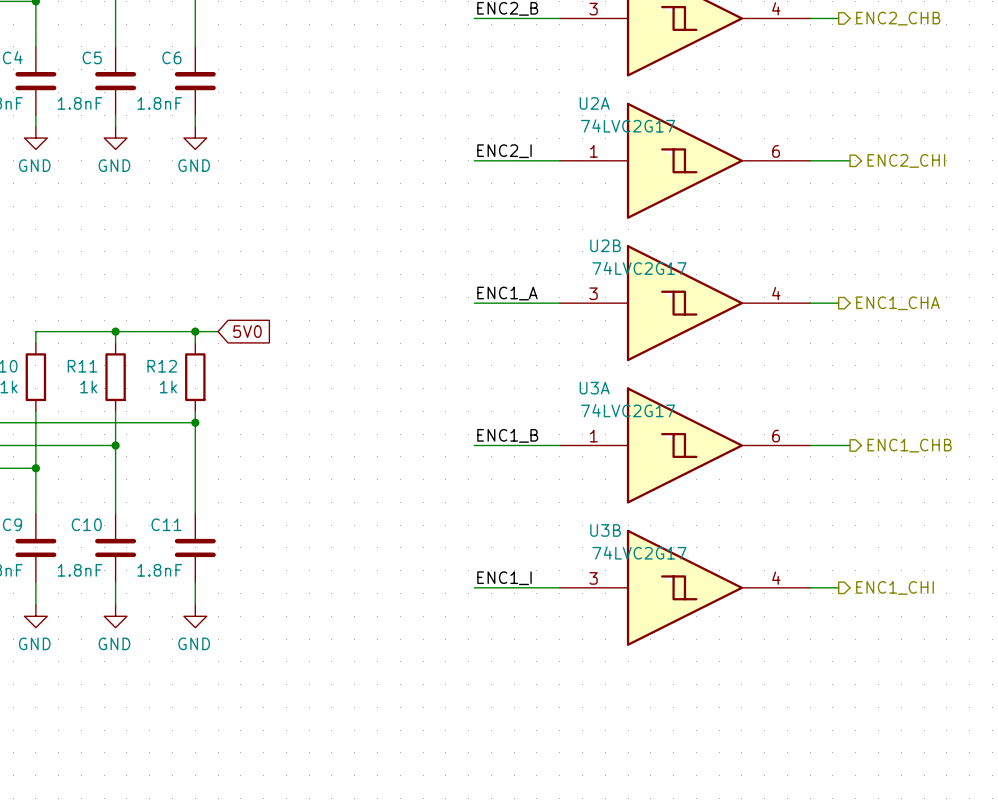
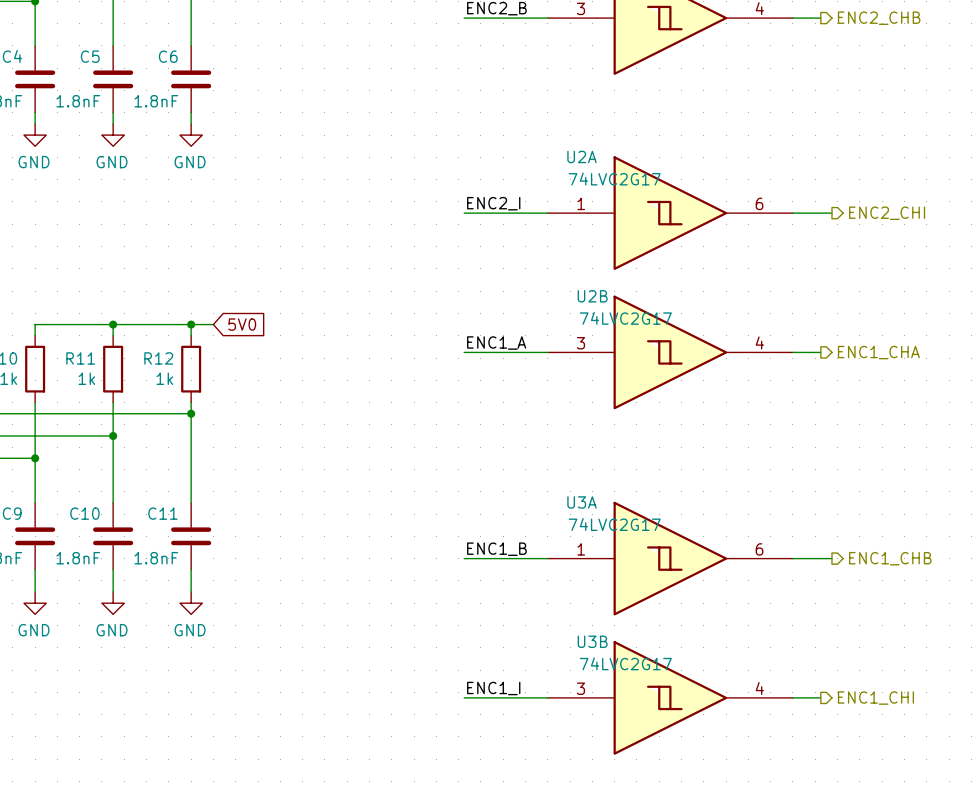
label position: ENC2_I (504, 151) -> ENC2_I (493, 203)
wire: (474, 160) (559, 160) -> (464, 213) (547, 213)
U2A position: (684, 160) -> (670, 213)
wire: (810, 160) (850, 160) -> (792, 213) (831, 213)
hierarchical label position: ENC2_CHI (906, 160) -> ENC2_CHI (887, 213)
label position: ENC1_A (507, 293) -> ENC1_A (496, 343)
wire: (474, 303) (559, 303) -> (464, 352) (547, 352)
U2B position: (684, 303) -> (670, 352)
wire: (810, 303) (838, 303) -> (792, 352) (820, 352)
hierarchical label position: ENC1_CHA (897, 303) -> ENC1_CHA (878, 352)
label position: ENC1_B (507, 435) -> ENC1_B (496, 549)
wire: (474, 445) (559, 445) -> (464, 558) (547, 558)
U3A position: (684, 445) -> (670, 558)
wire: (810, 445) (850, 445) -> (792, 558) (831, 558)
hierarchical label position: ENC1_CHB (909, 445) -> ENC1_CHB (890, 558)
label position: ENC1_I (504, 578) -> ENC1_I (493, 688)
wire: (474, 587) (559, 587) -> (464, 697) (547, 697)
U3B position: (684, 587) -> (670, 697)
wire: (810, 587) (838, 587) -> (792, 697) (820, 697)
hierarchical label position: ENC1_CHI (894, 587) -> ENC1_CHI (875, 698)

